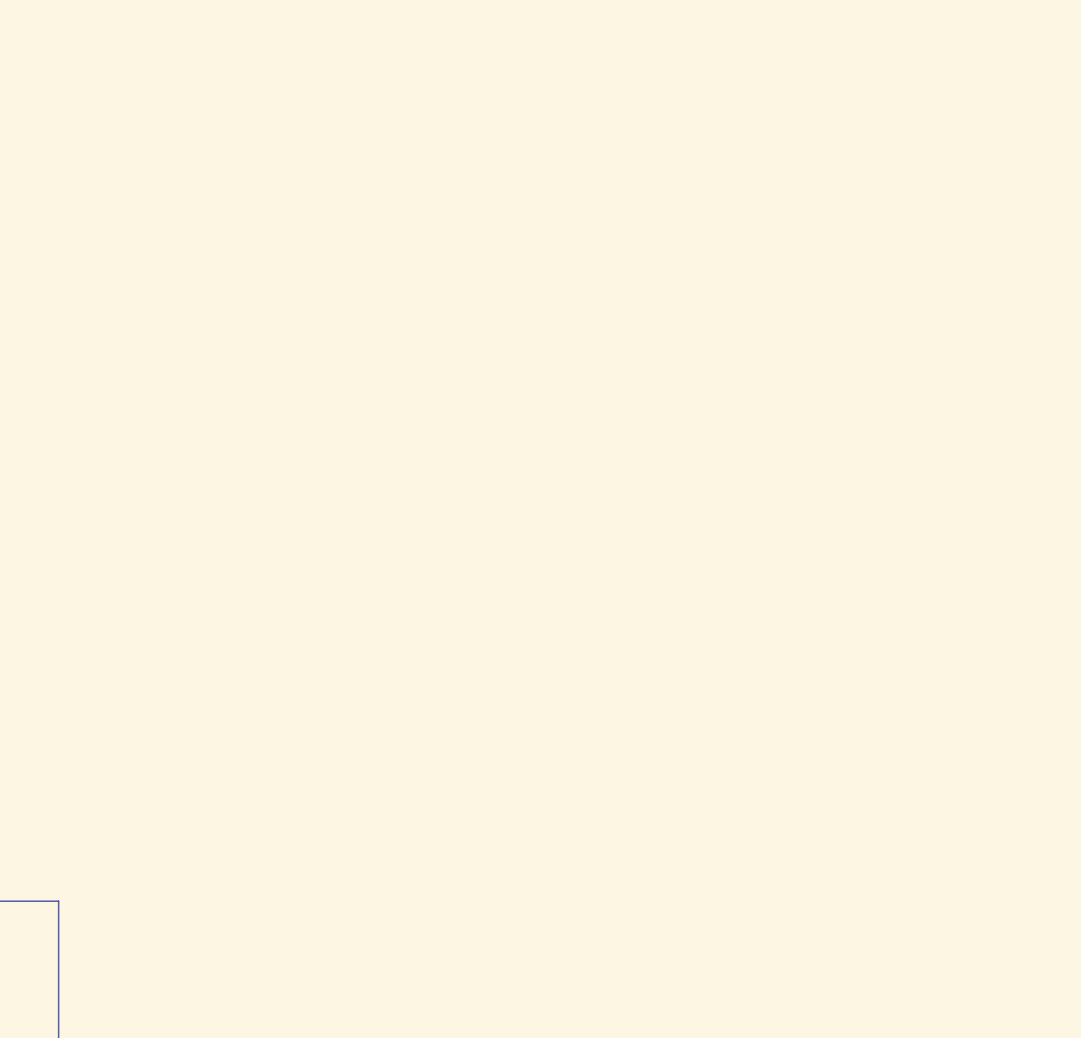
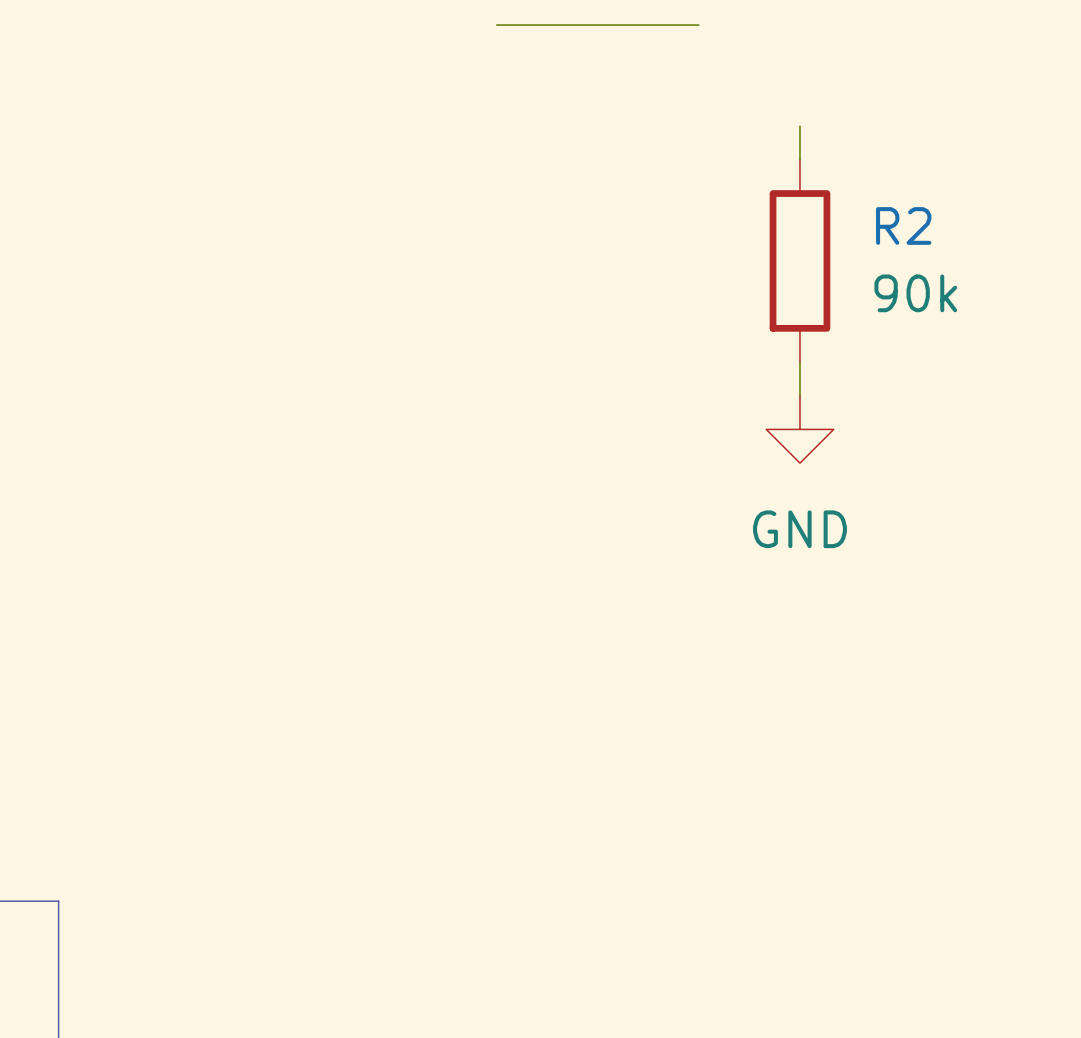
wire: none -> (496, 25) (698, 25)
wire: none -> (799, 126) (799, 159)
R2: none -> 90k (799, 260)
wire: none -> (799, 362) (799, 395)
power symbol: none -> GND (799, 429)

